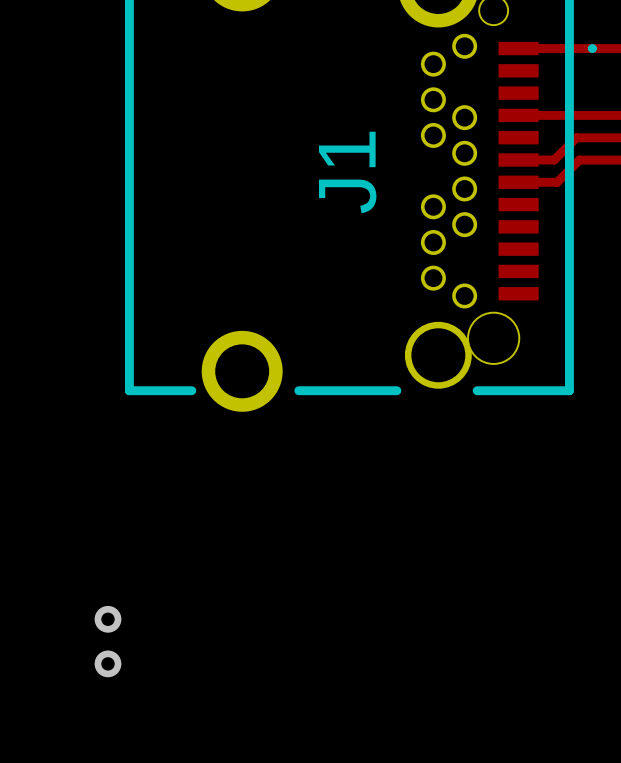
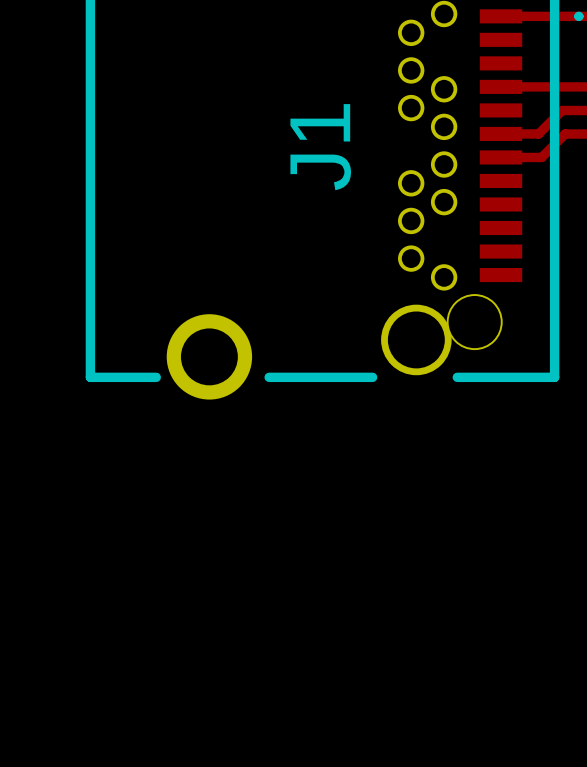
via: (108, 619) -> none
via: (108, 663) -> none

